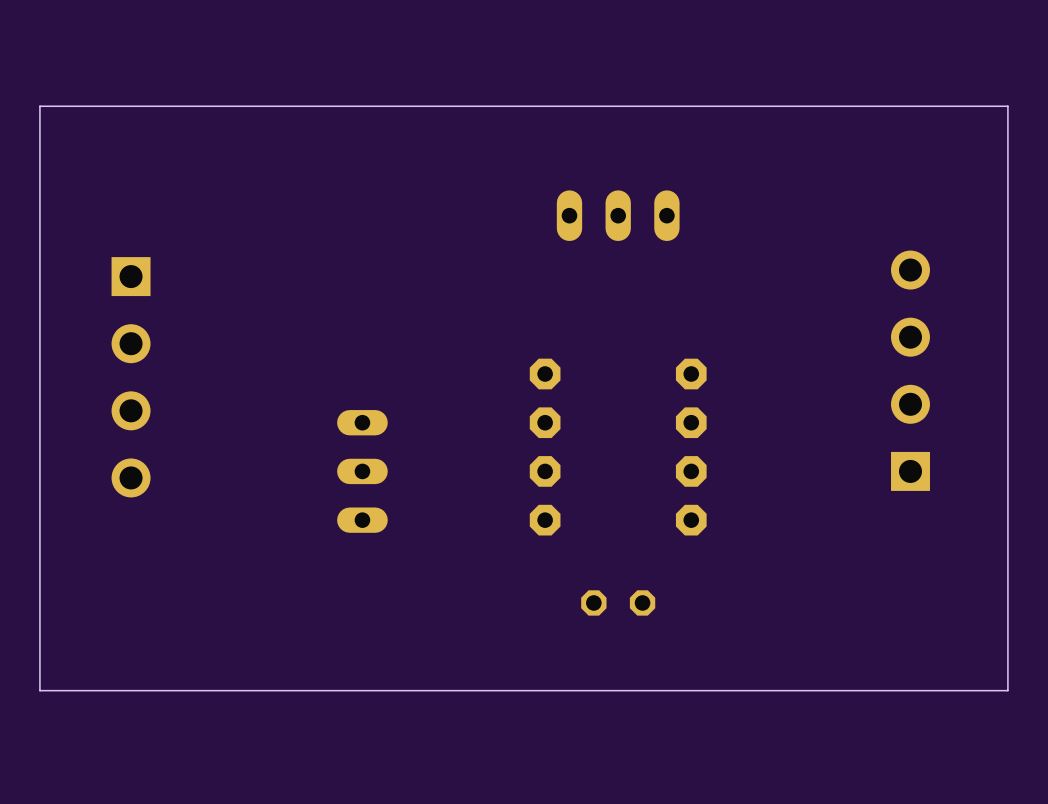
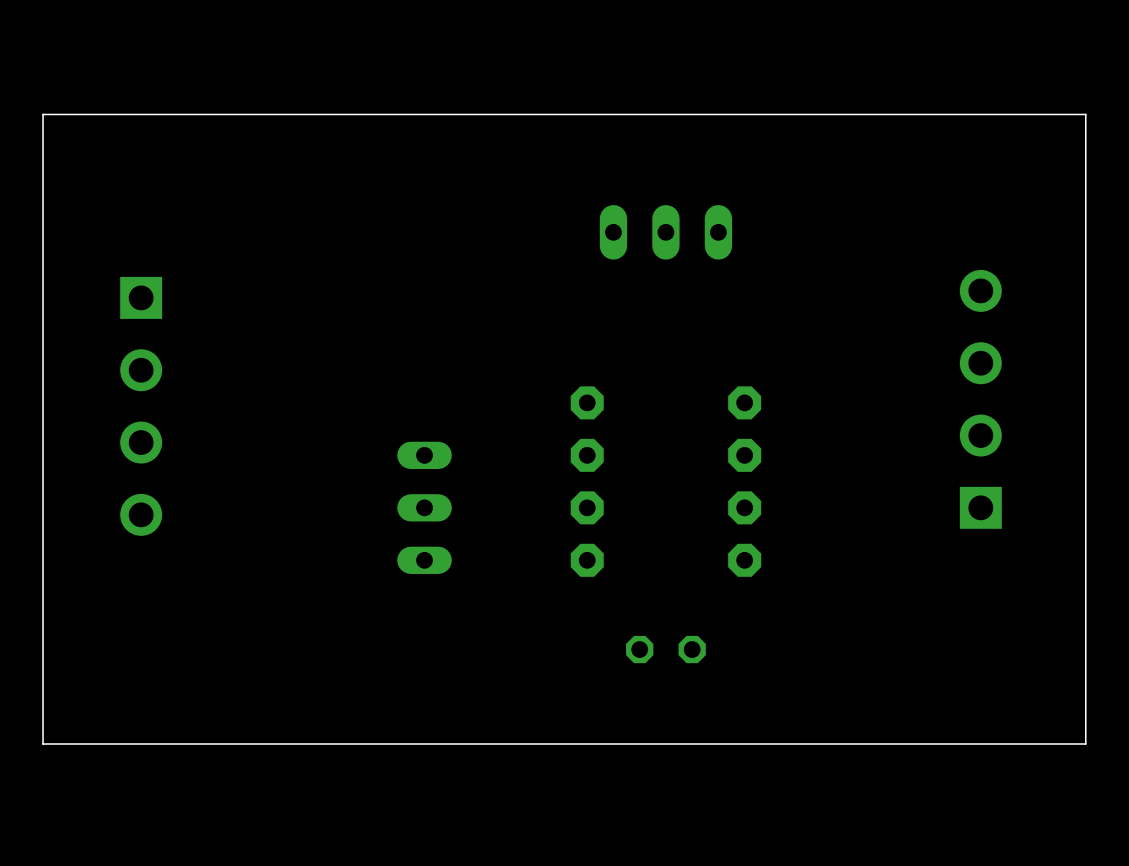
part position: (362, 471) -> (424, 507)

